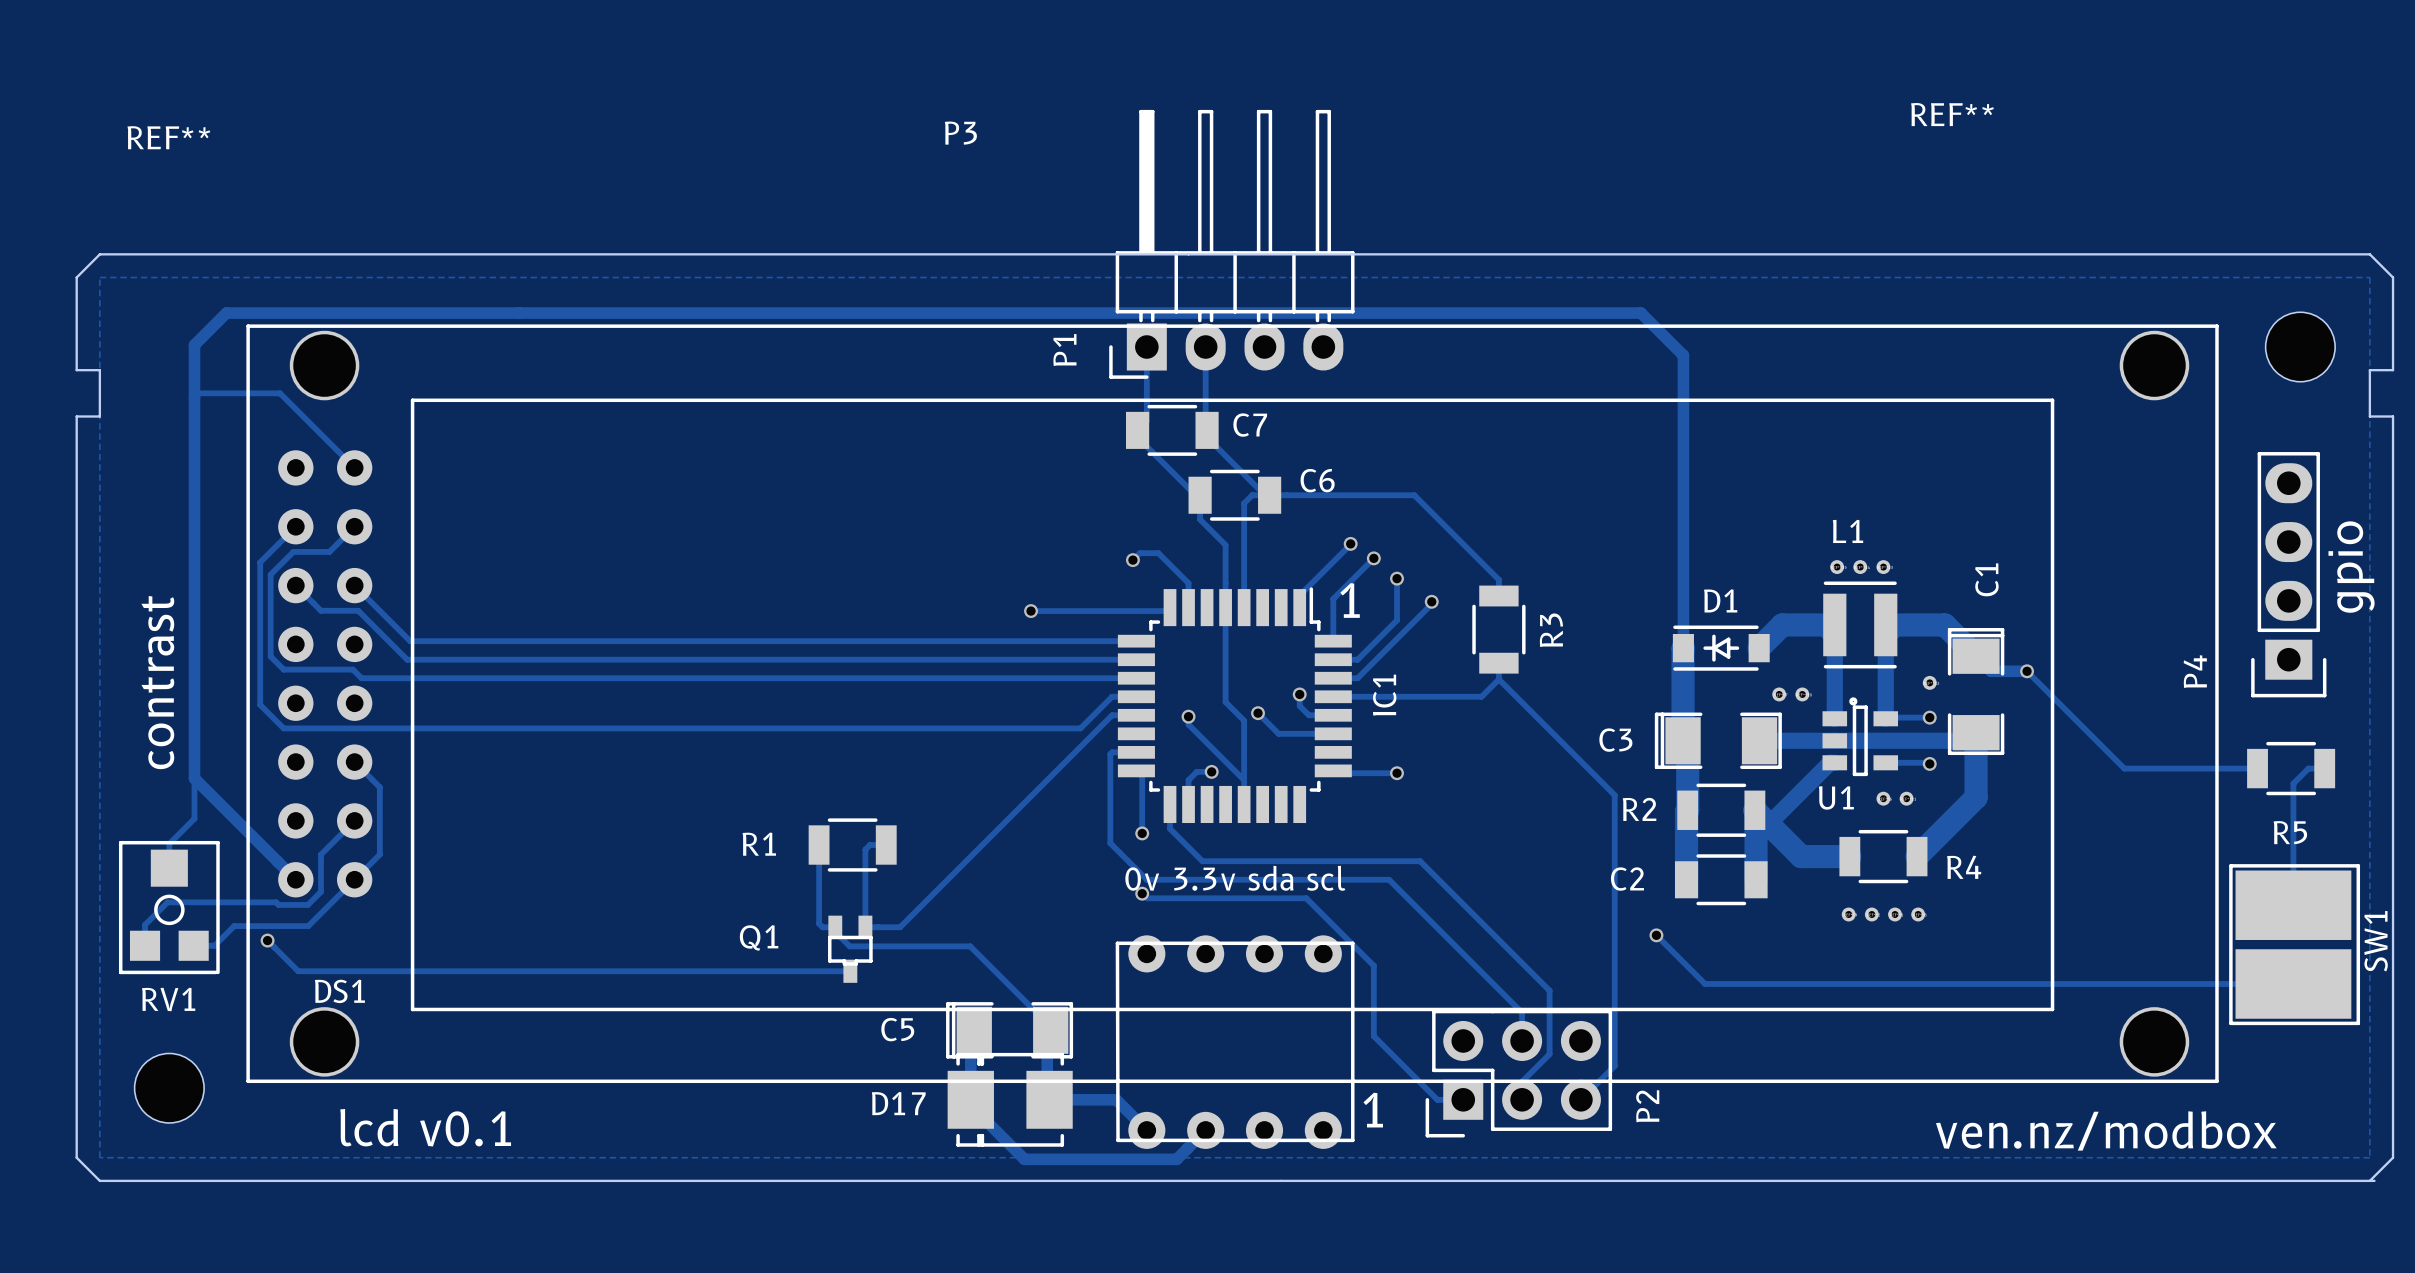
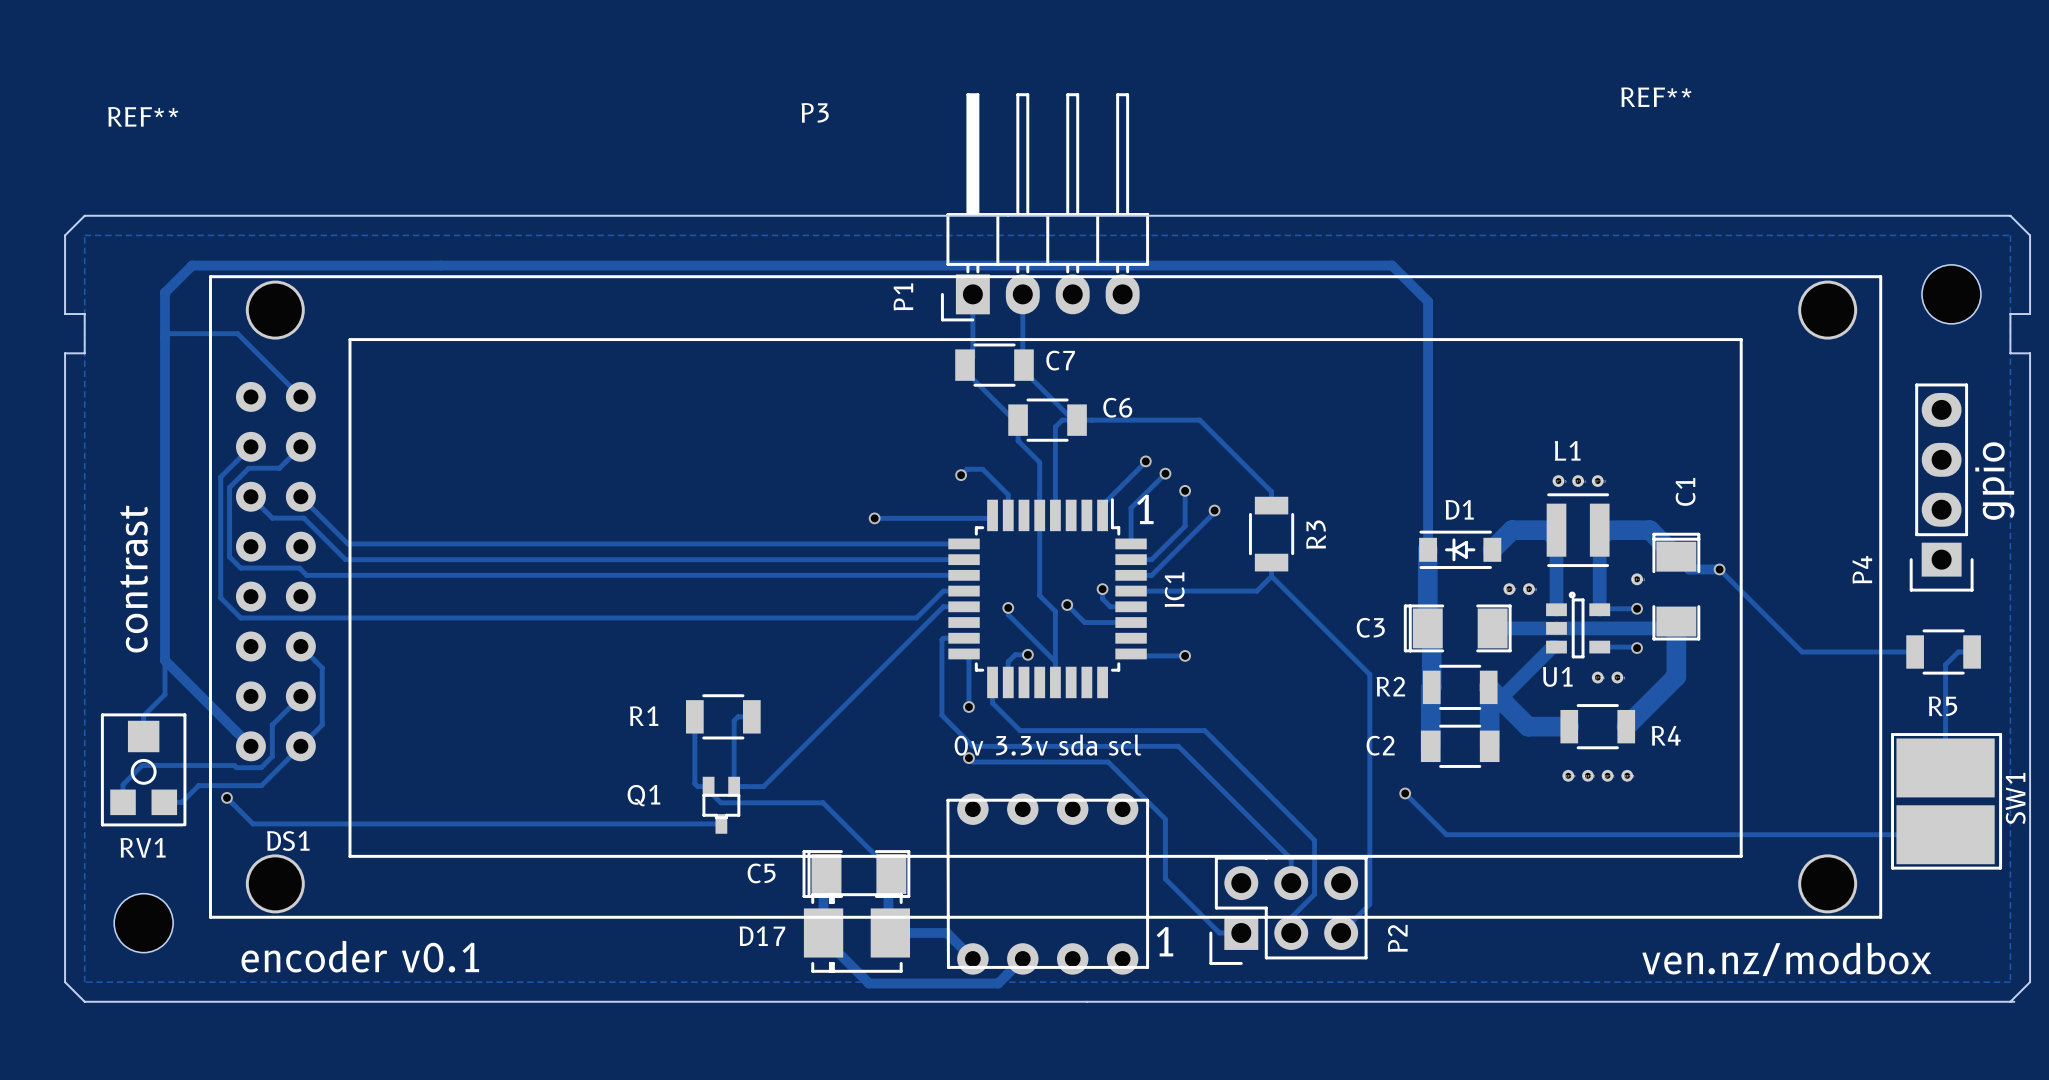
text: lcd v0.1 (425, 1127) -> encoder v0.1 (360, 956)

